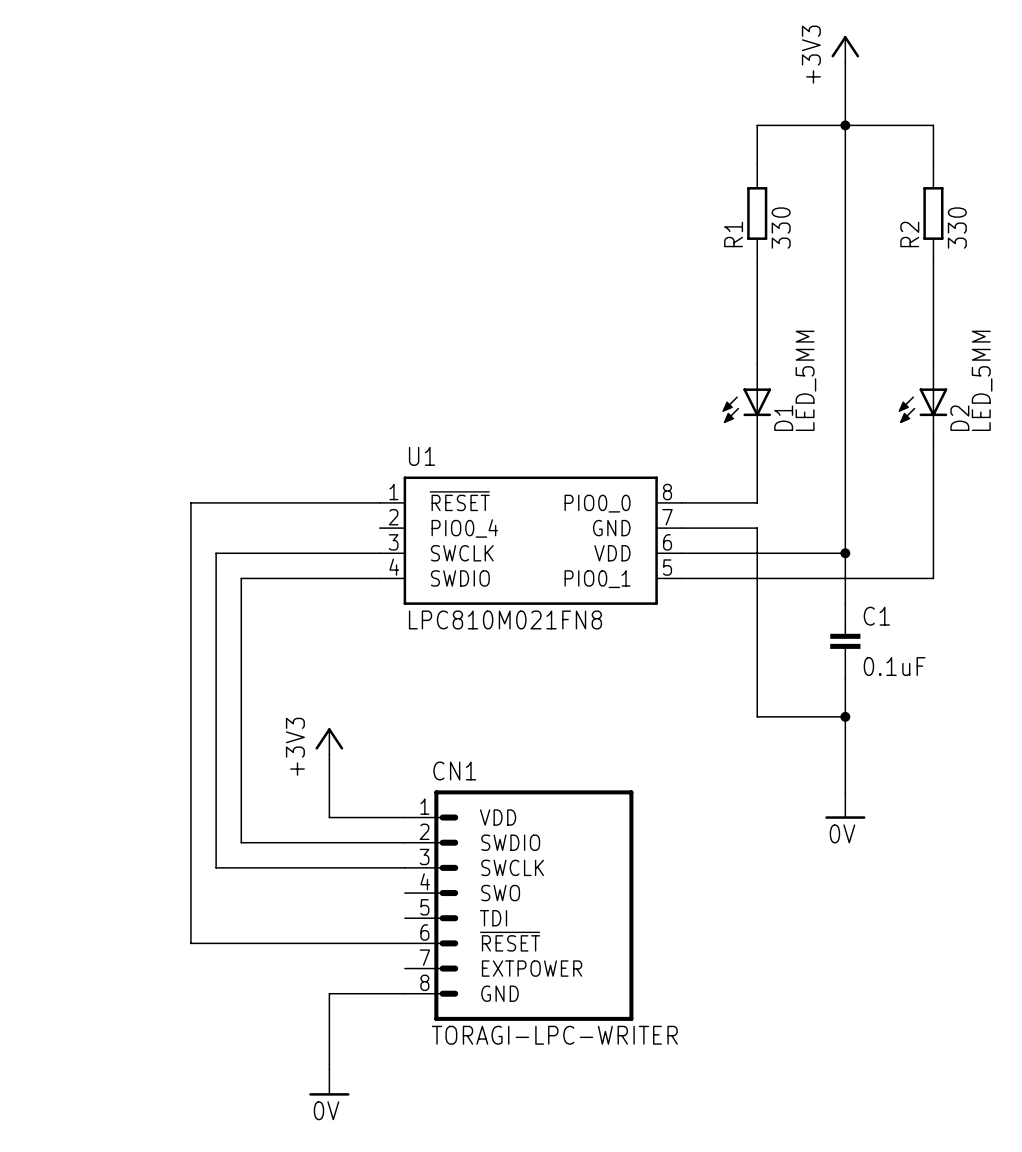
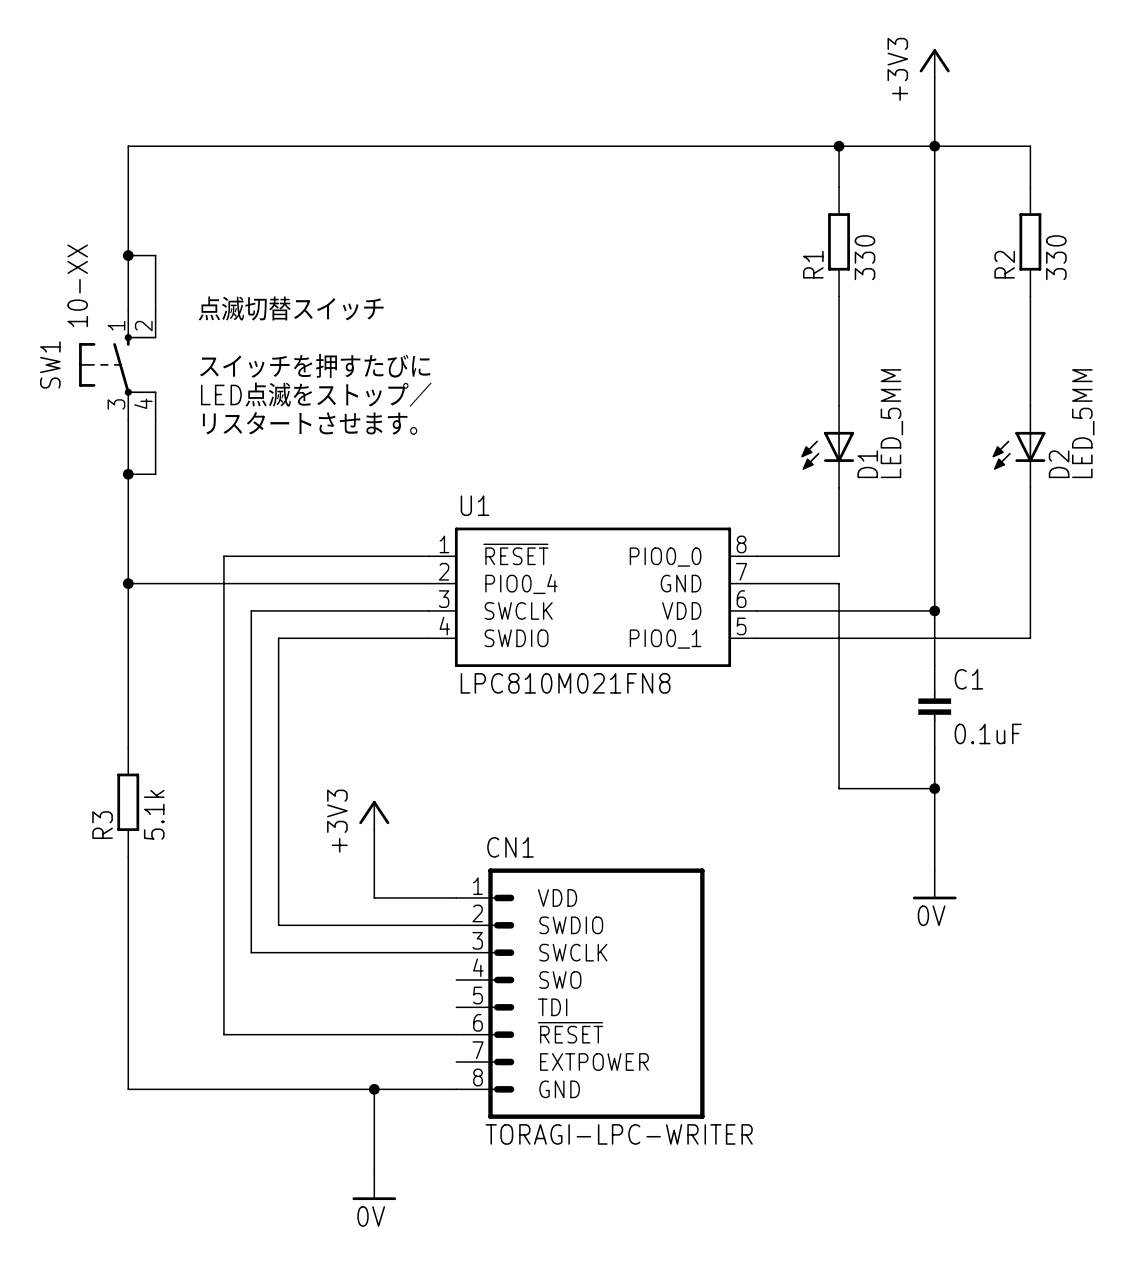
wire: none -> (839, 146) (128, 146) (128, 310)
junction: none -> (839, 146)
wire: none -> (128, 255) (155, 255) (155, 310)
junction: none -> (128, 255)
text: none -> 点滅切替スイッチ (291, 308)
SW1: none -> 10-XX (117, 364)
text: none -> スイッチを押すたびに (315, 365)
text: none -> LED点滅をストップ／ (316, 394)
wire: none -> (128, 419) (128, 747)
wire: none -> (155, 419) (155, 474) (128, 474)
text: none -> リスタートさせます。 (310, 423)
junction: none -> (128, 474)
wire: none -> (128, 583) (428, 583)
junction: none -> (128, 583)
R3: none -> 5.1k (128, 802)
wire: none -> (128, 856) (128, 1089) (374, 1089)
junction: none -> (374, 1089)

